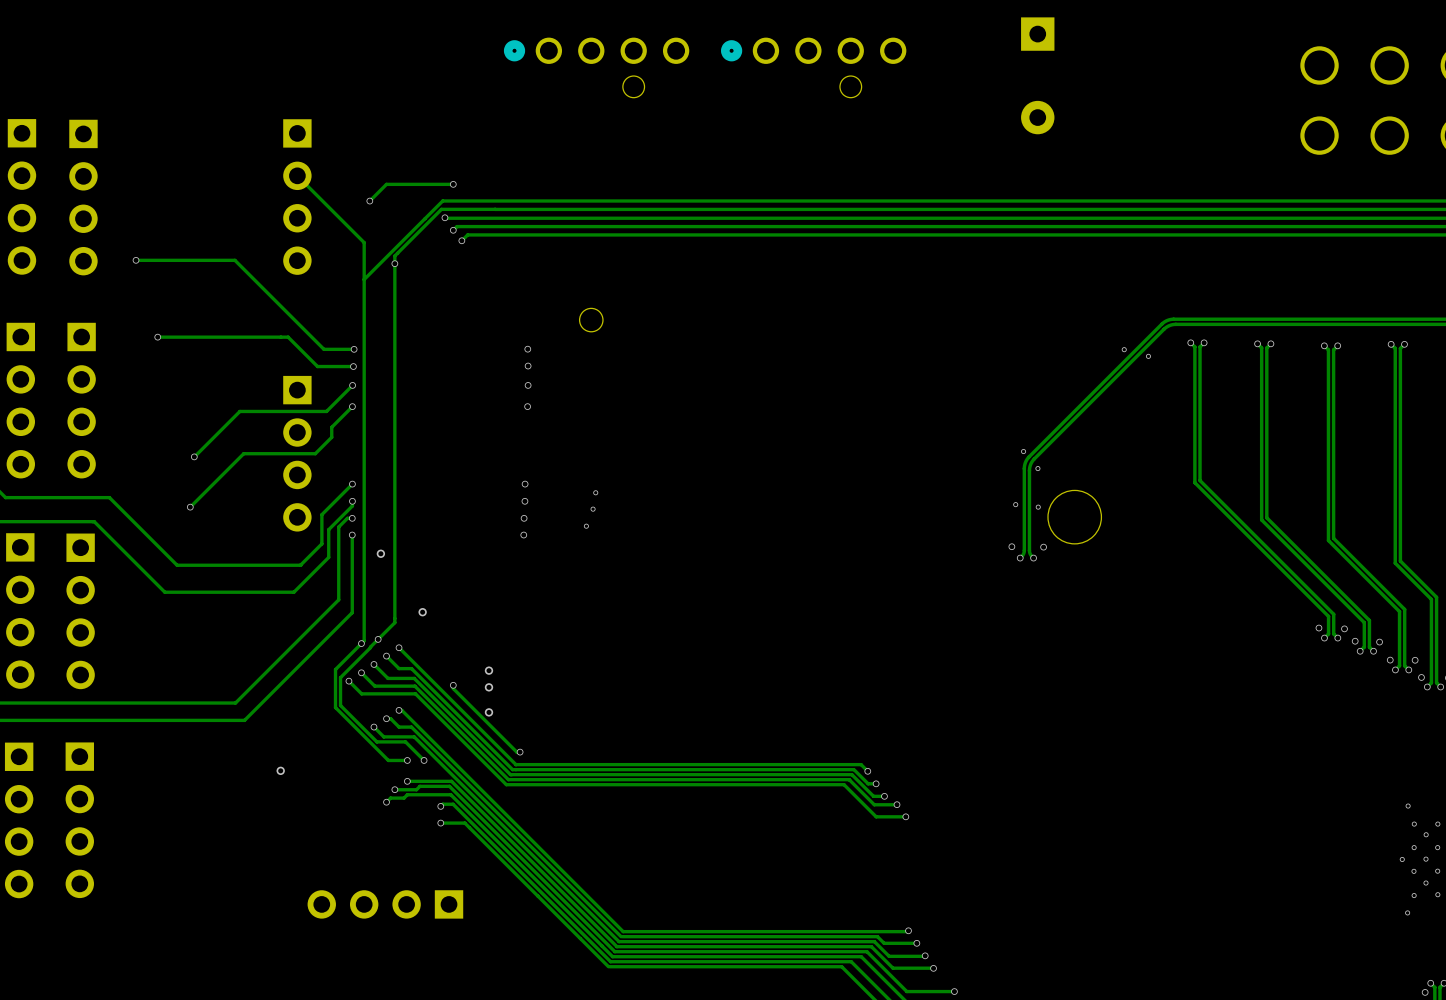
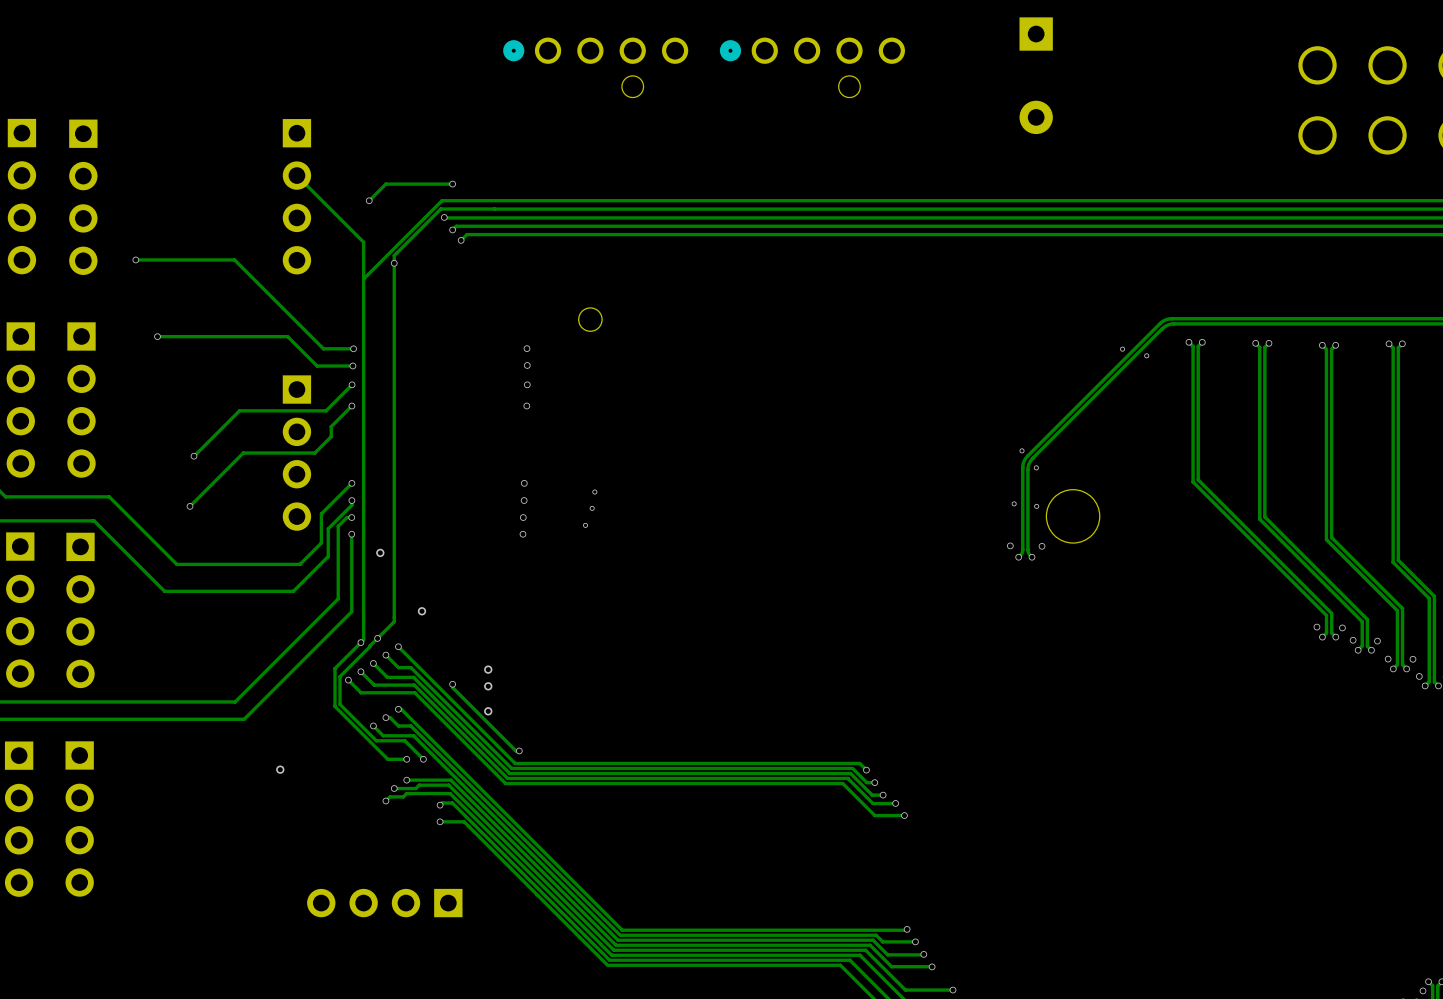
via: (1408, 806) -> none
via: (1414, 824) -> none
via: (1437, 824) -> none
via: (1426, 834) -> none
via: (1414, 847) -> none
via: (1437, 847) -> none
via: (1402, 859) -> none
via: (1425, 859) -> none
via: (1413, 871) -> none
via: (1437, 871) -> none
via: (1425, 883) -> none
via: (1437, 894) -> none
via: (1414, 895) -> none
via: (1407, 912) -> none

